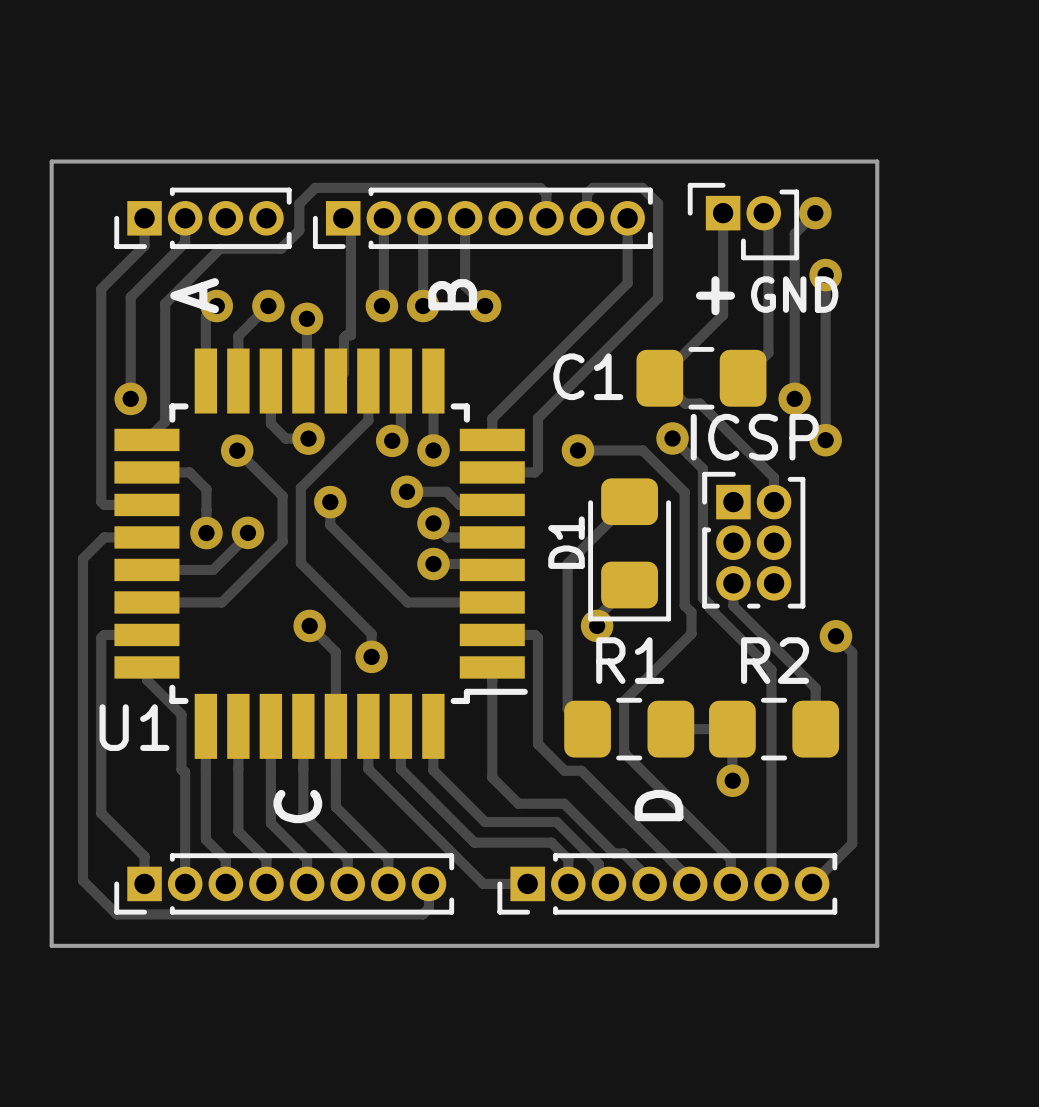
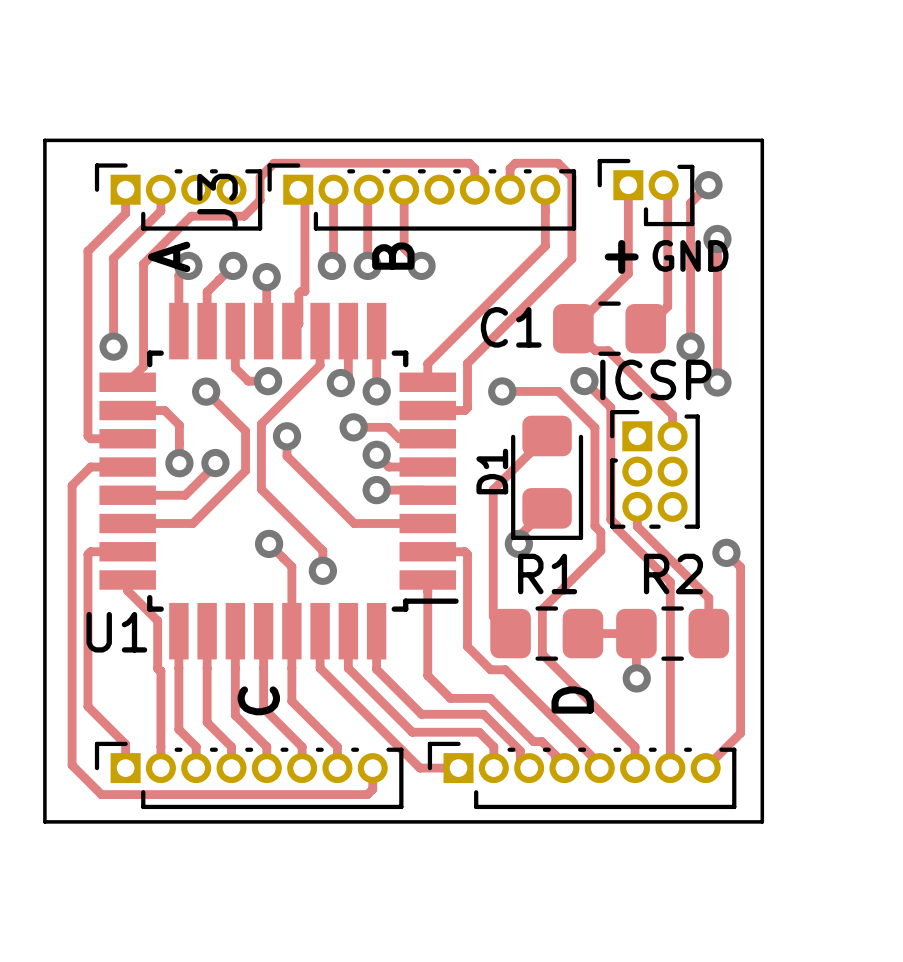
part footprint: [114, 187, 292, 249] -> [94, 163, 263, 231]
part: (482, 218) -> none
J3: none -> (421, 197)
part footprint: [114, 853, 455, 915] -> [94, 741, 404, 810]
part footprint: [497, 853, 838, 915] -> [427, 741, 737, 810]

